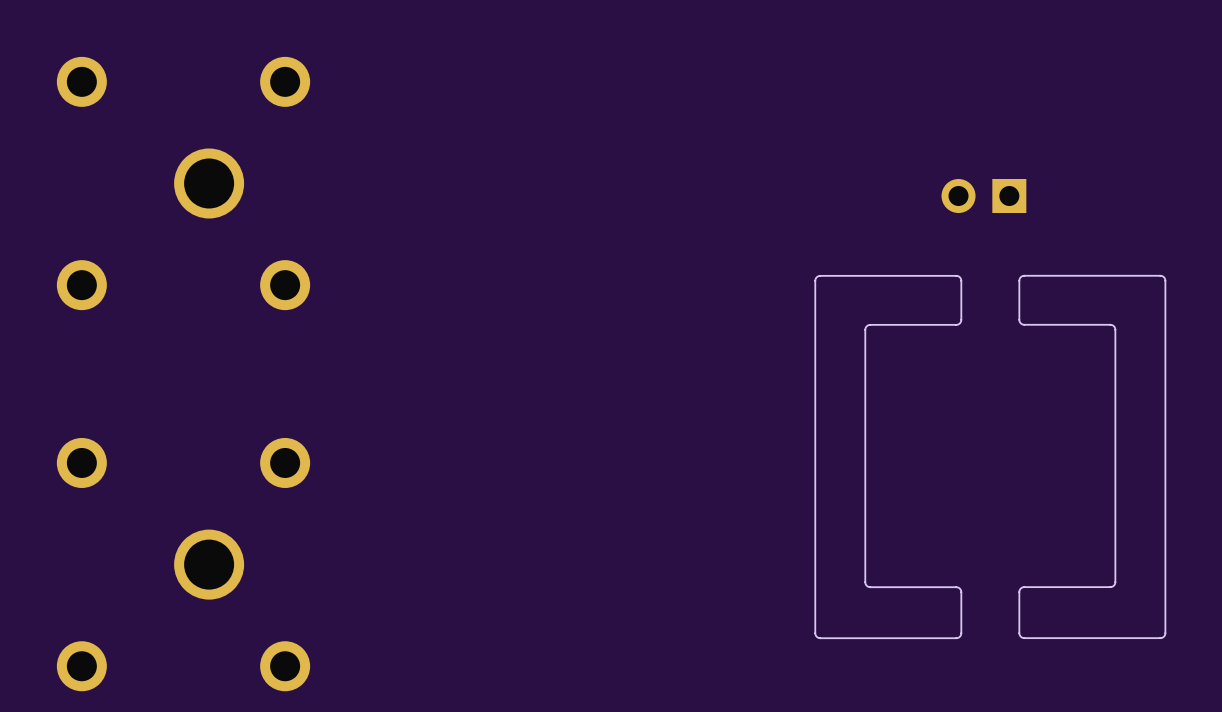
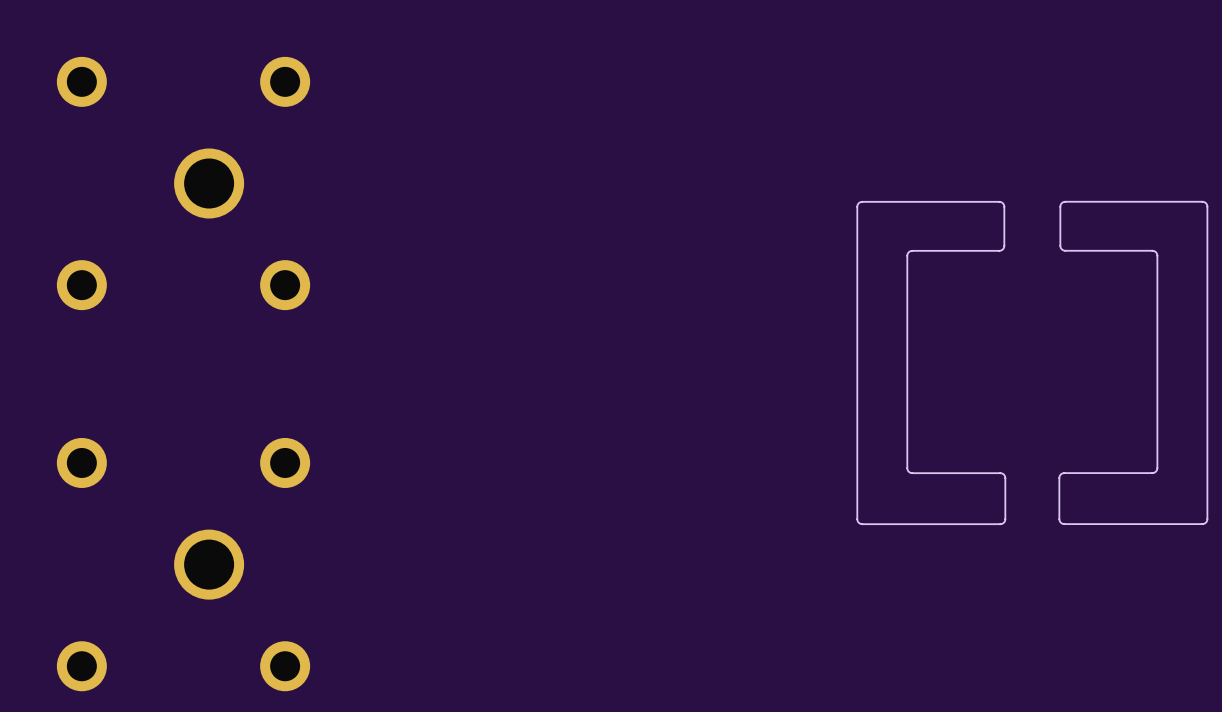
part: (983, 196) -> none
board edge: none -> (1202, 201) (1065, 201) (1060, 204) (1060, 245) (1063, 250) (1152, 250) (1157, 255) (1157, 469) (1152, 473) (1061, 473) (1059, 478) (1059, 519) (1062, 523) (1202, 524) (1206, 521) (1207, 206) (1202, 201)
board edge: (1160, 275) (1024, 275) (1019, 279) (1019, 320) (1022, 324) (1110, 324) (1115, 329) (1115, 583) (1110, 587) (1021, 587) (1019, 592) (1019, 633) (1022, 637) (1160, 638) (1165, 634) (1165, 280) (1160, 275) -> none
board edge: none -> (907, 468) (912, 473) (1002, 473) (1005, 477) (1005, 519)
board edge: none -> (907, 468) (907, 254) (912, 250) (1002, 250) (1004, 245) (1004, 206) (1000, 202) (862, 201) (857, 204) (857, 519)
board edge: none -> (1005, 519) (1000, 524) (862, 524) (857, 519)
board edge: (961, 633) (961, 633) (960, 635) (959, 636) (956, 638) (820, 638) (815, 635) (815, 280) (818, 276) (956, 275) (960, 278) (961, 319) (958, 324) (870, 324) (865, 328) (865, 582) (870, 587) (958, 587) (961, 592) (961, 633) -> none

